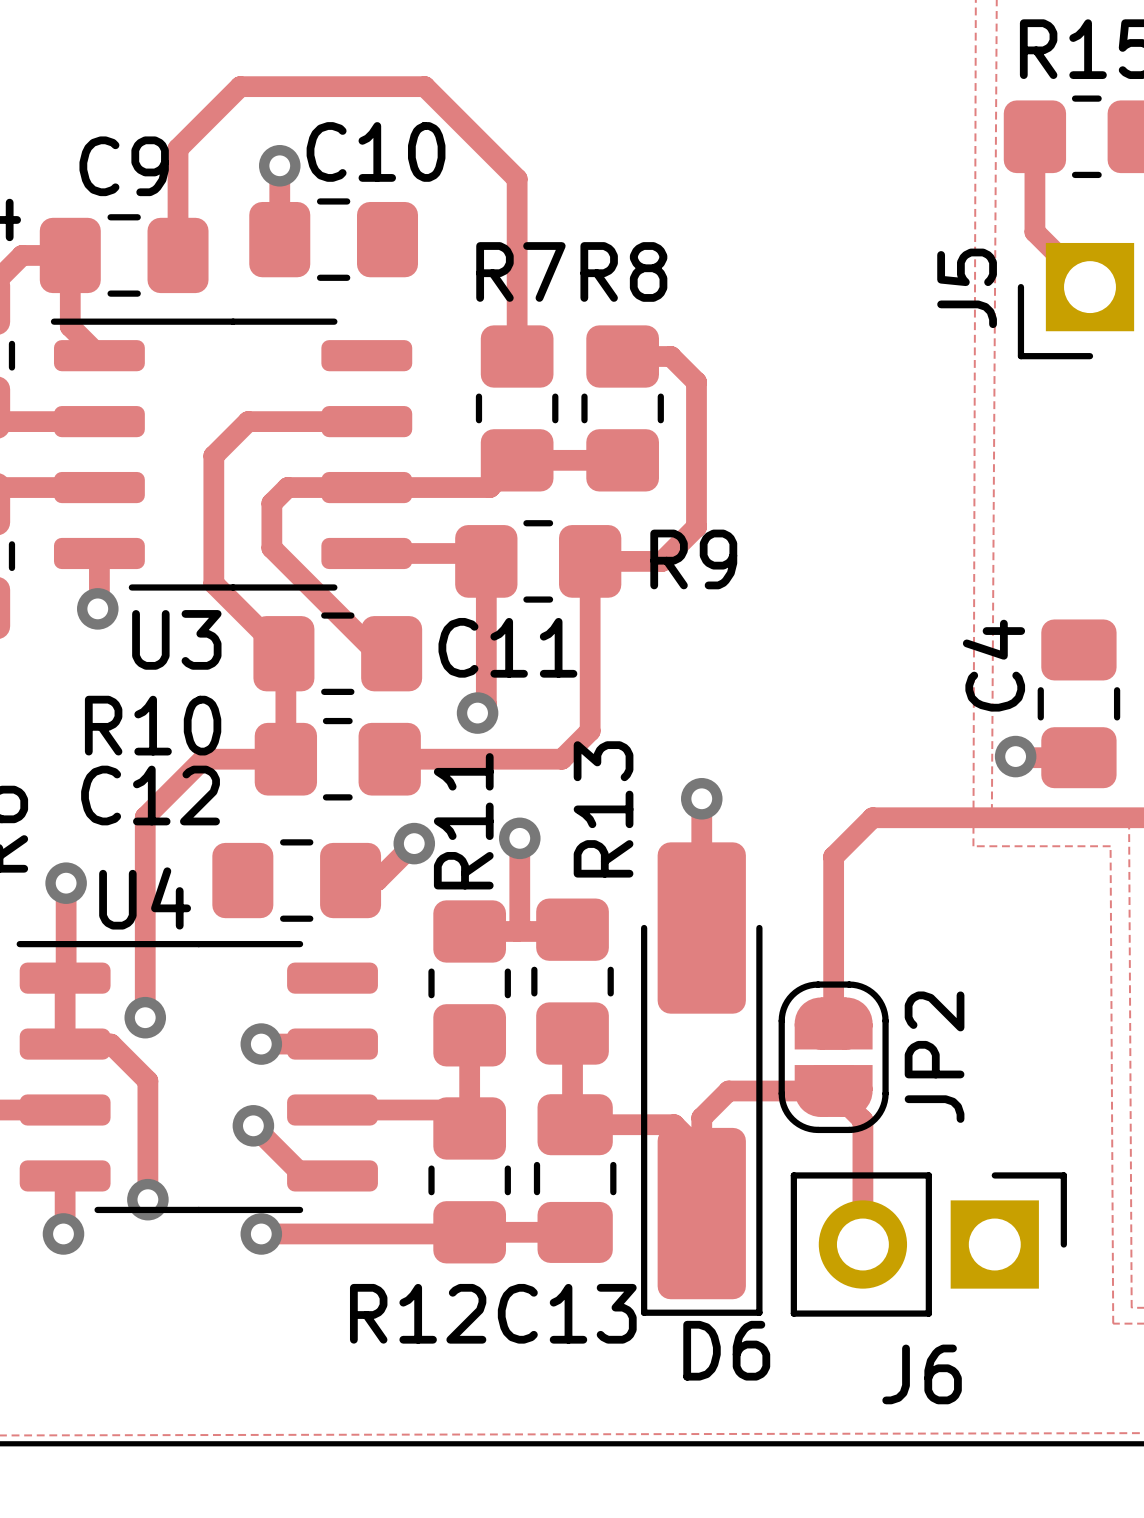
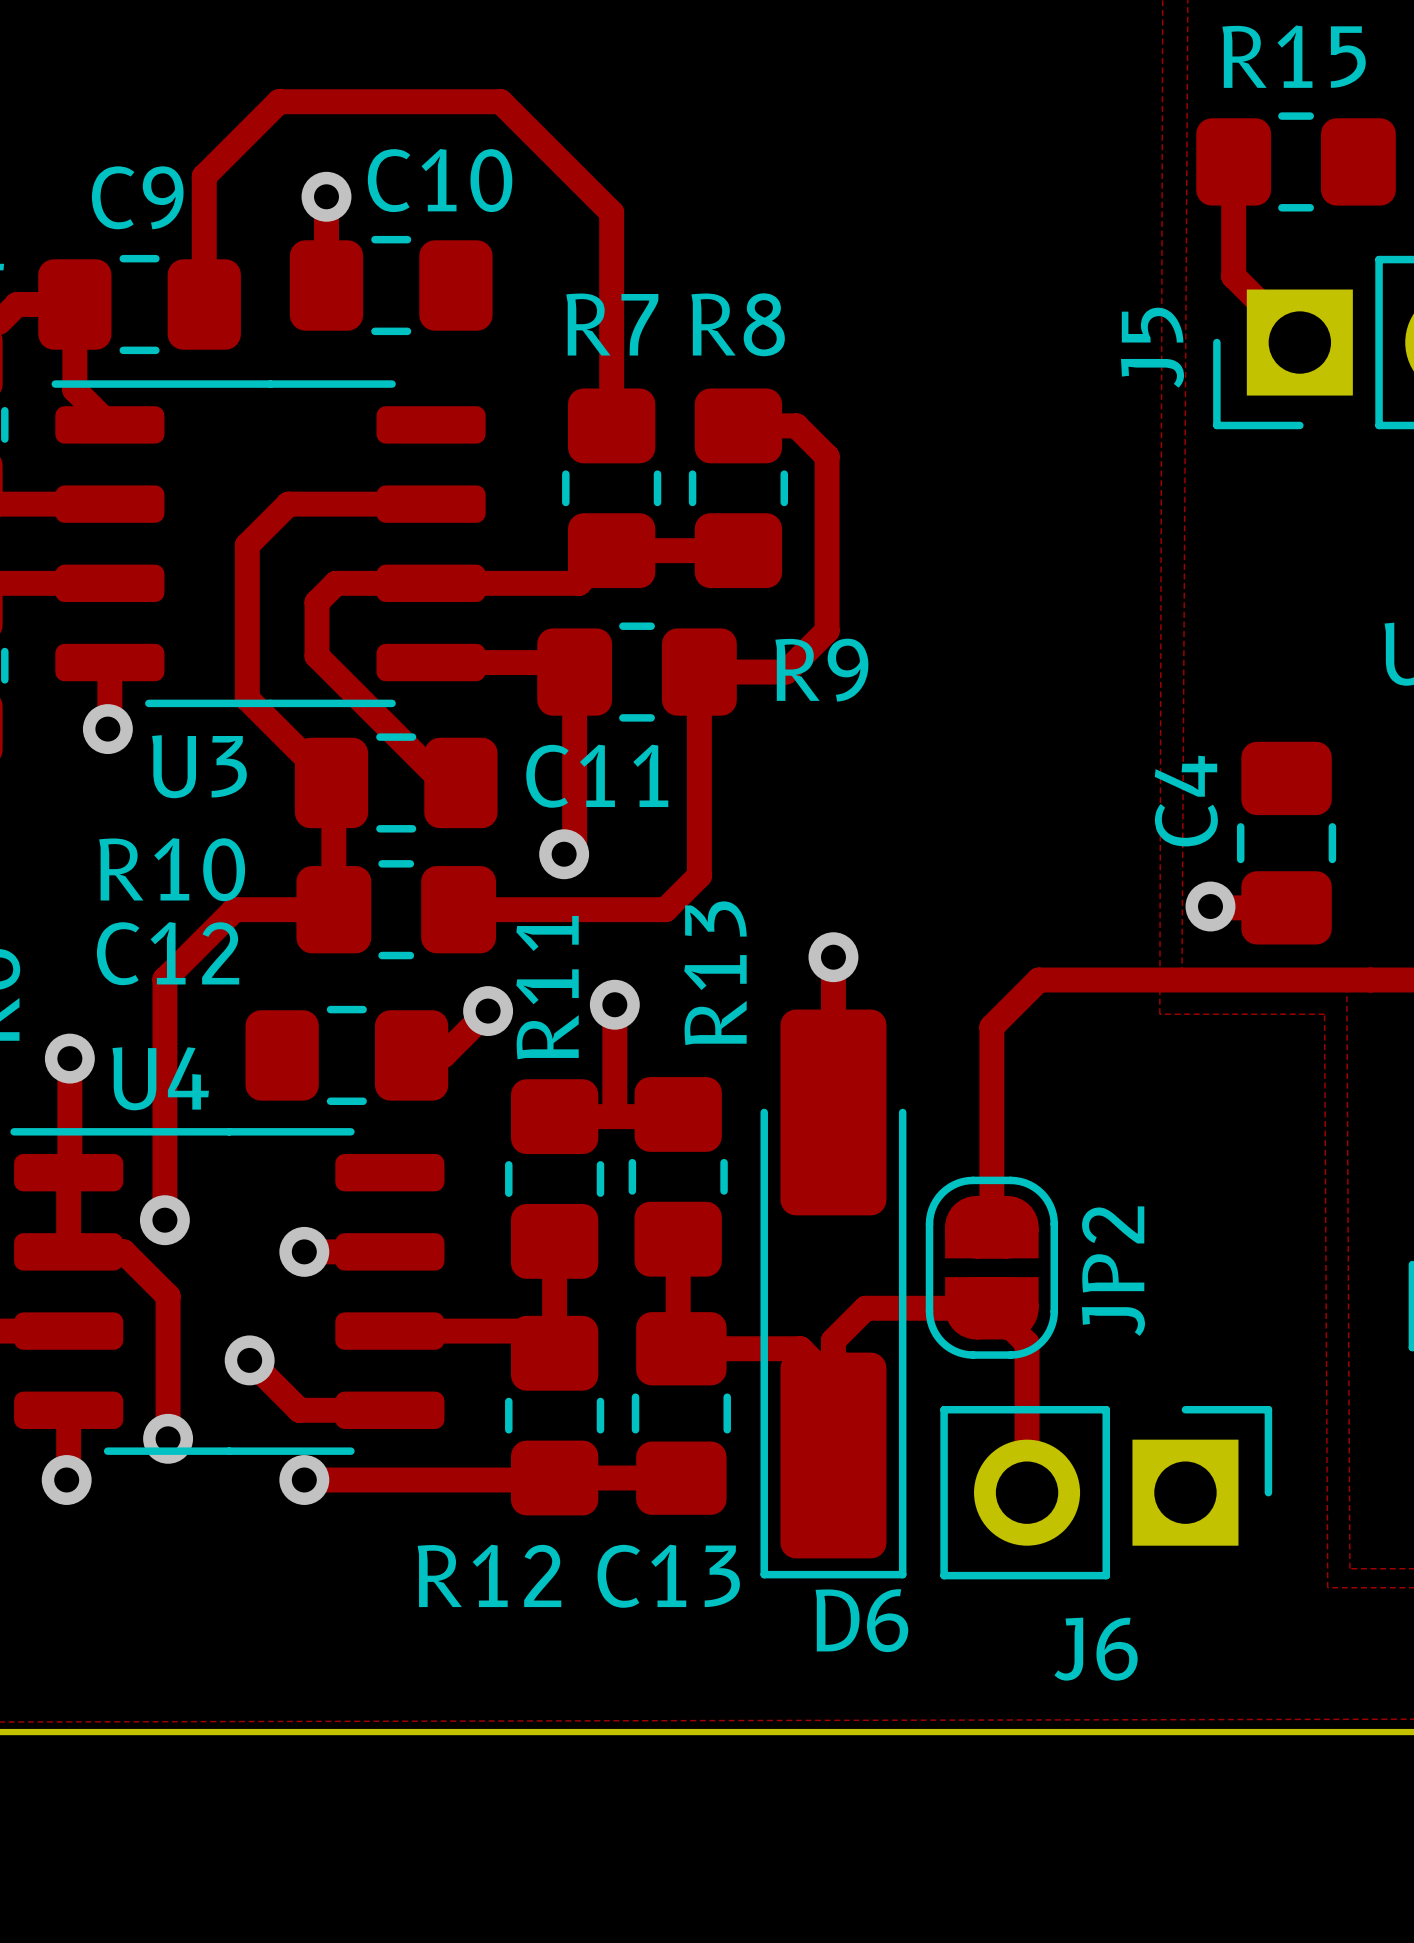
track: (253, 1125) (303, 1175) -> (249, 1360) (299, 1410) (355, 1410)
via position: (253, 1125) -> (249, 1360)

